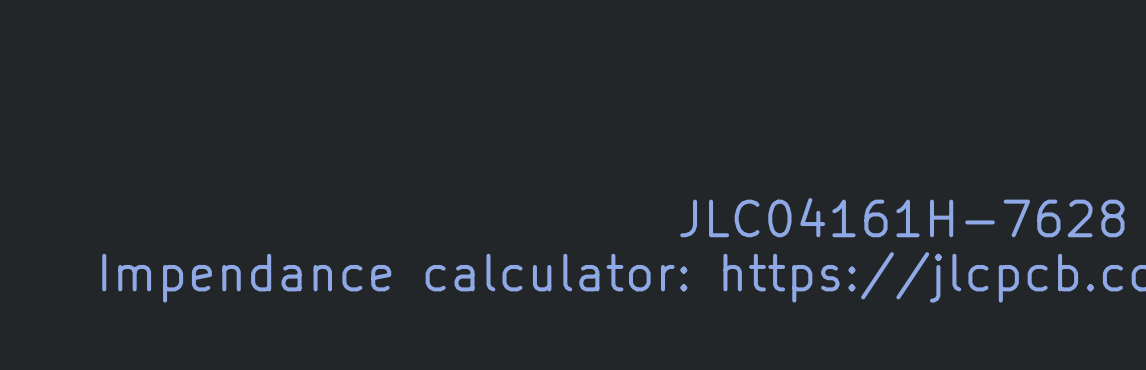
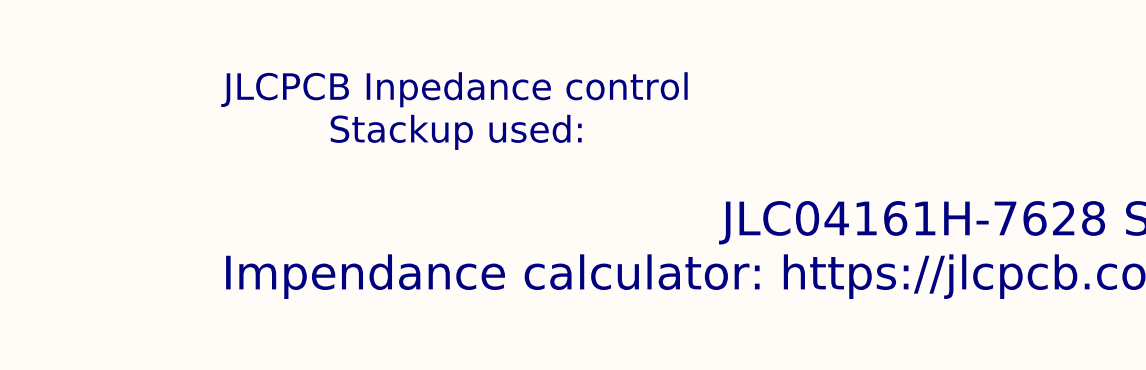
text: none -> JLCPCB Inpedance control (454, 89)
text: none -> Stackup used: (456, 132)

